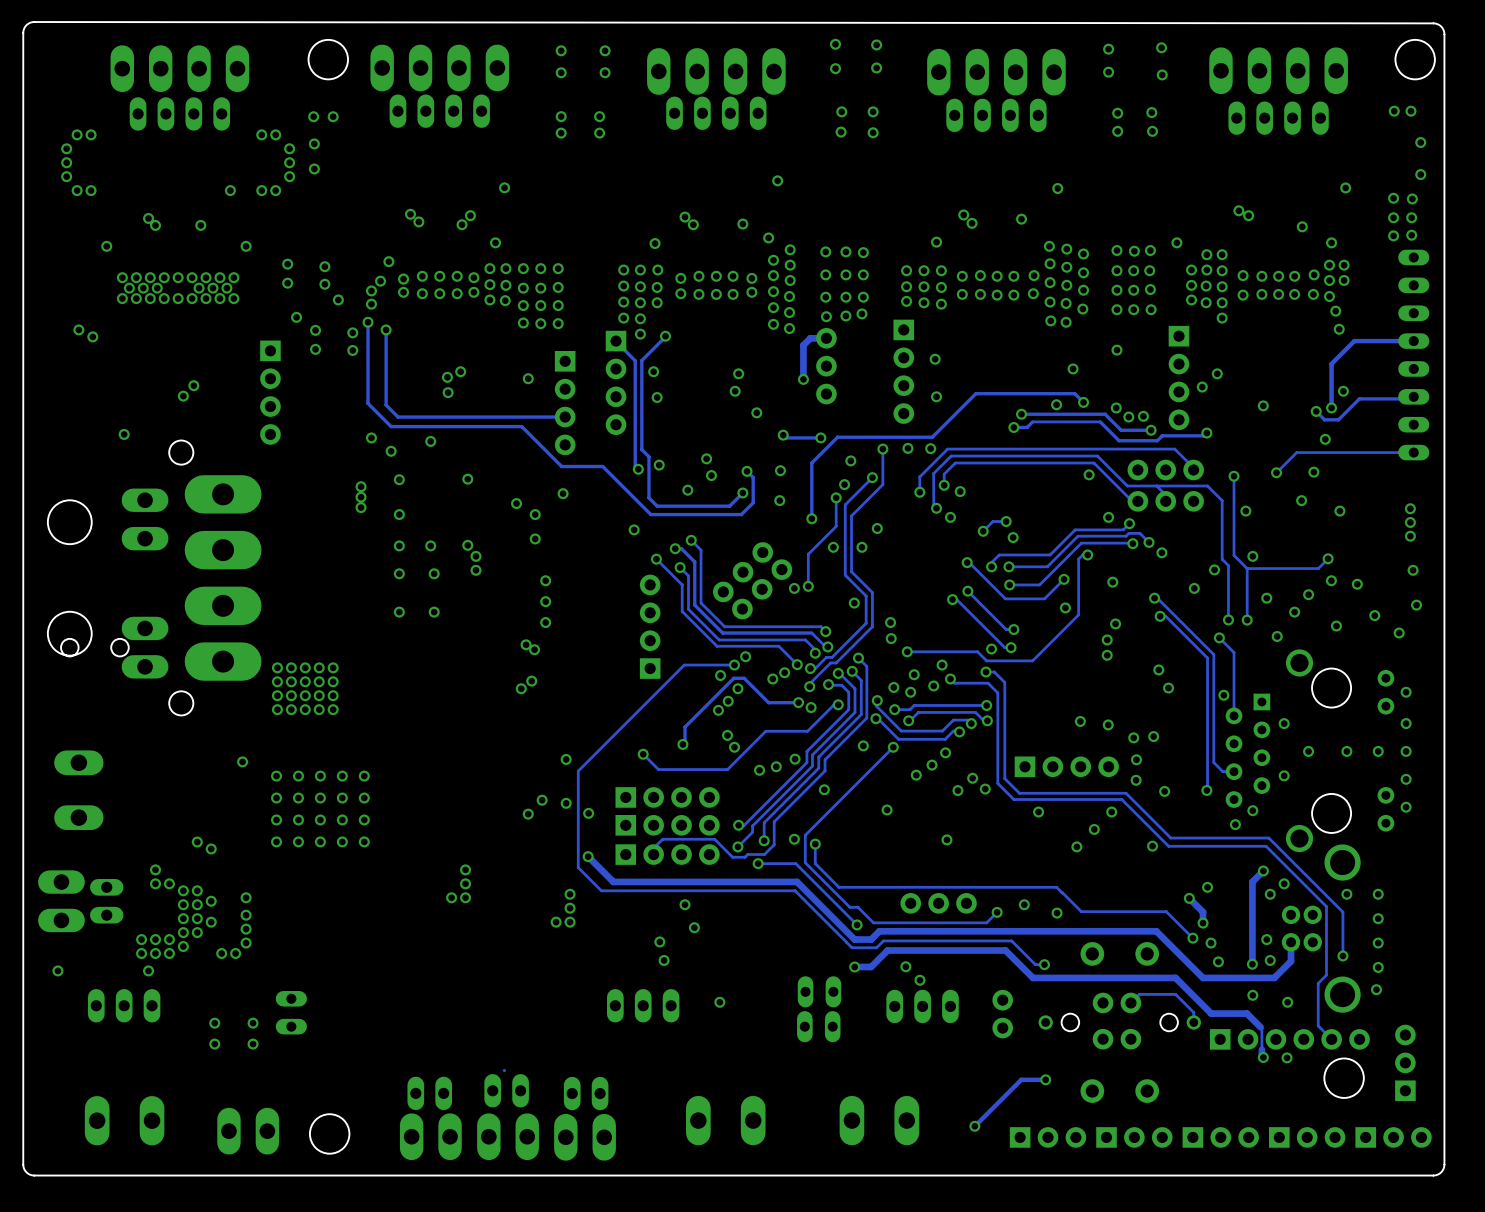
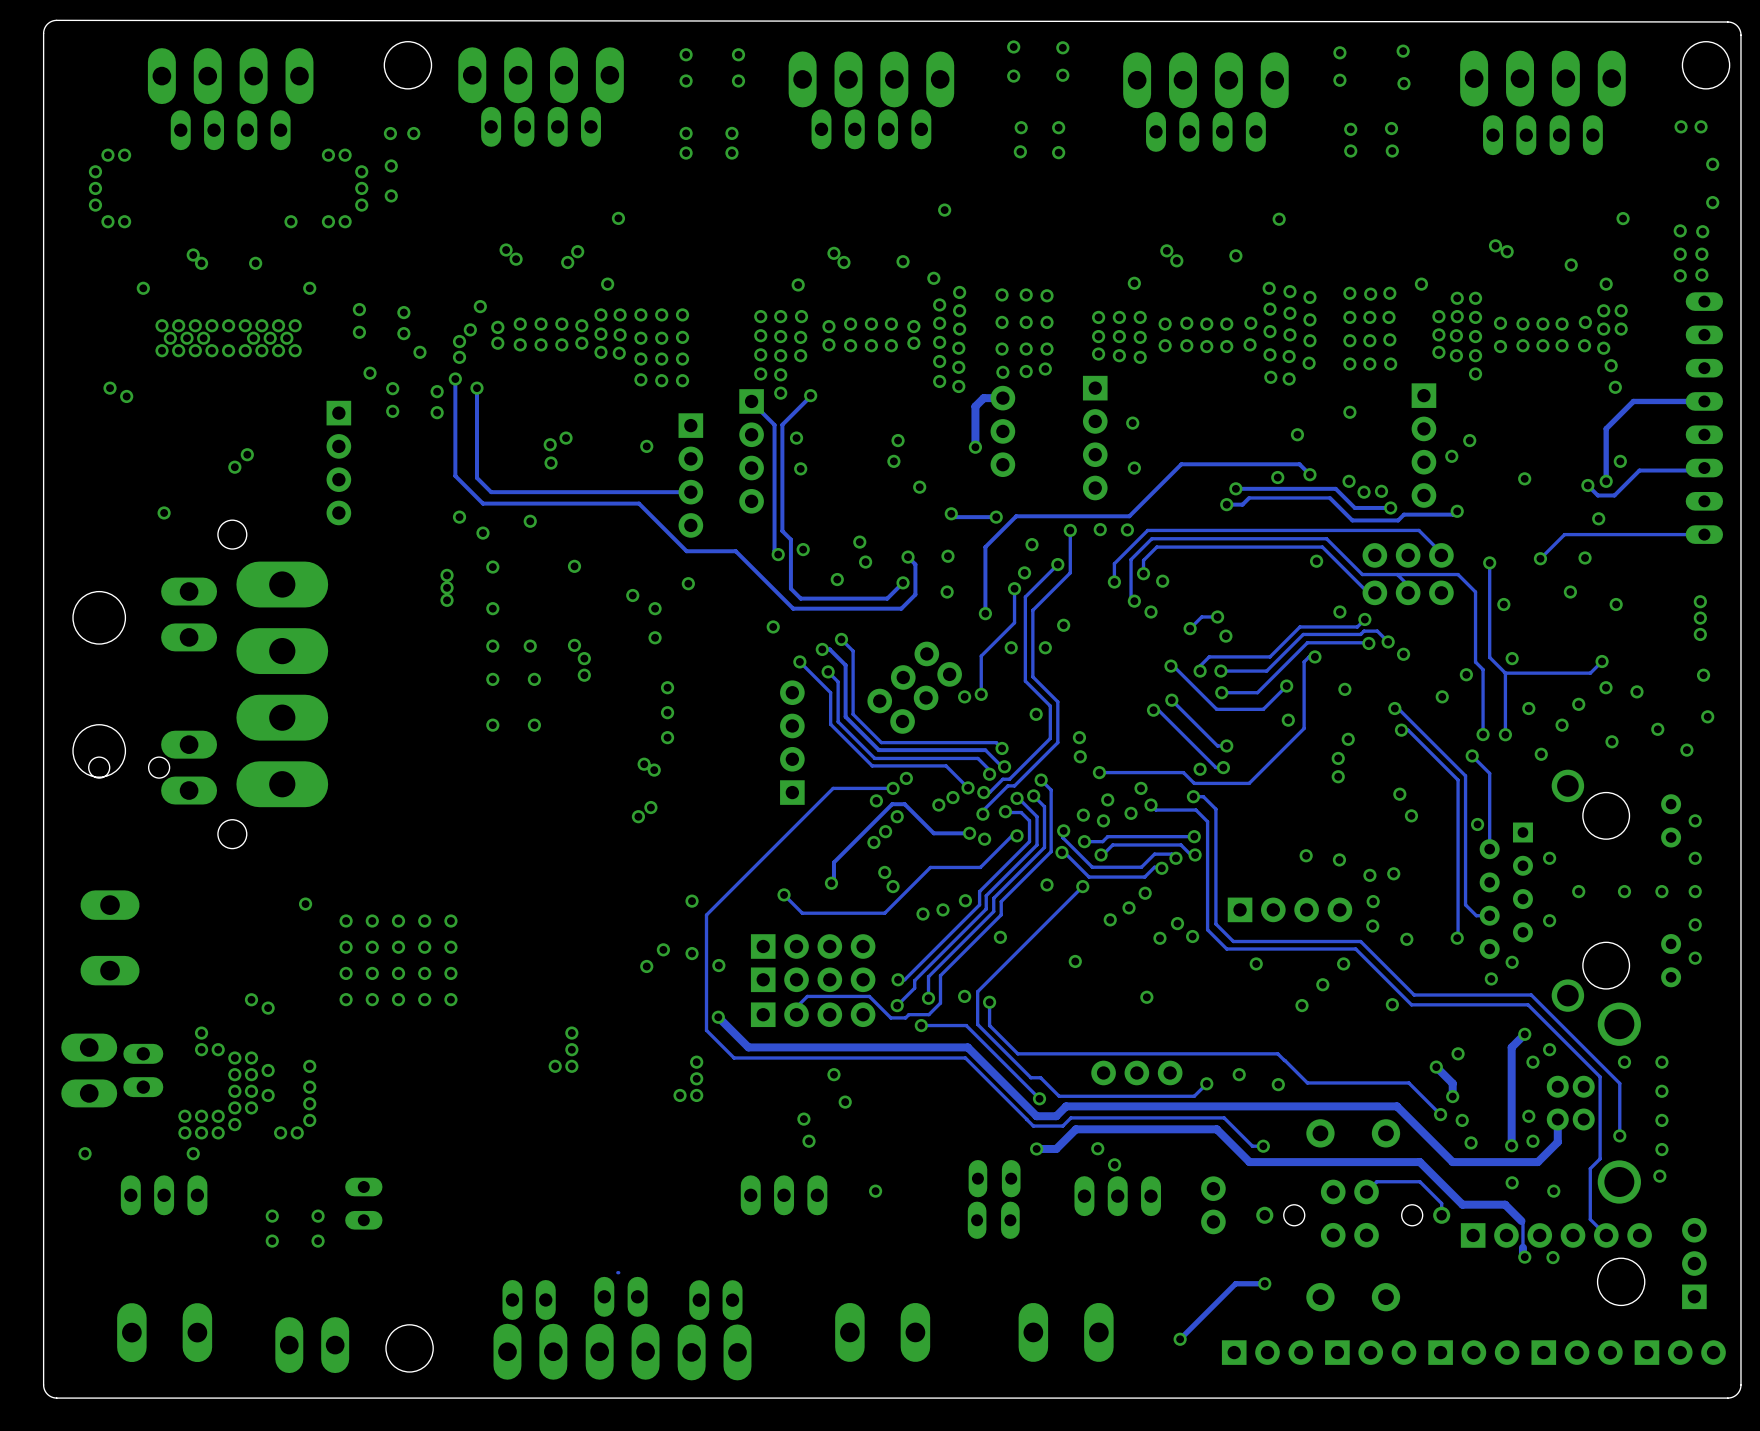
via: (277, 667) -> none
via: (291, 667) -> none
via: (305, 667) -> none
via: (319, 667) -> none
via: (333, 667) -> none
via: (277, 681) -> none
via: (291, 681) -> none
via: (305, 681) -> none
via: (319, 681) -> none
via: (333, 681) -> none
via: (277, 695) -> none
via: (291, 695) -> none
via: (305, 695) -> none
via: (319, 695) -> none
via: (333, 695) -> none
via: (277, 709) -> none
via: (291, 709) -> none
via: (305, 709) -> none
via: (319, 709) -> none
via: (333, 709) -> none

